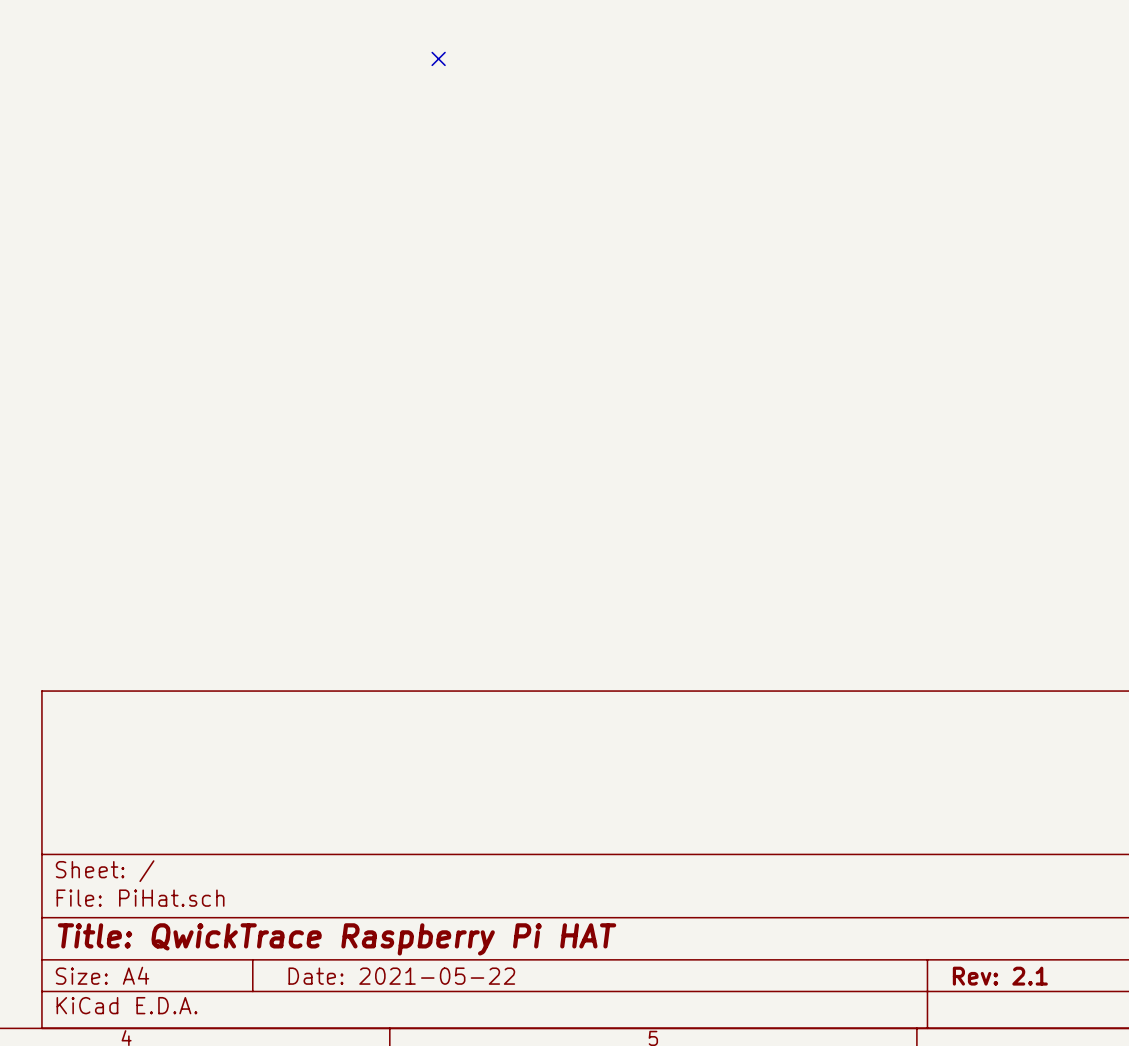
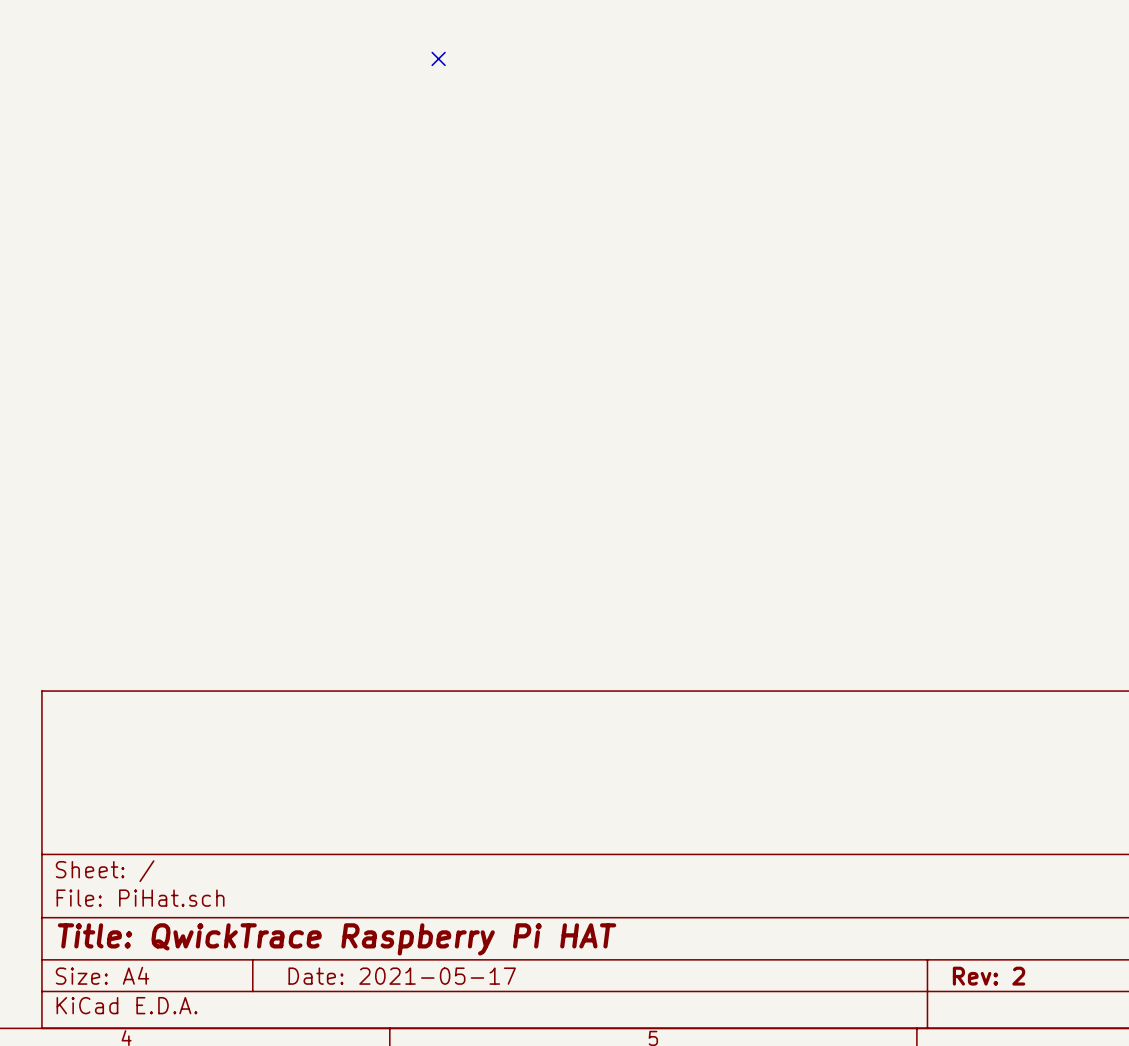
title block: Date: 2021-05-22 (401, 976) -> Date: 2021-05-17 (402, 976)
title block: Rev: 2.1 (1000, 976) -> Rev: 2 (989, 976)

